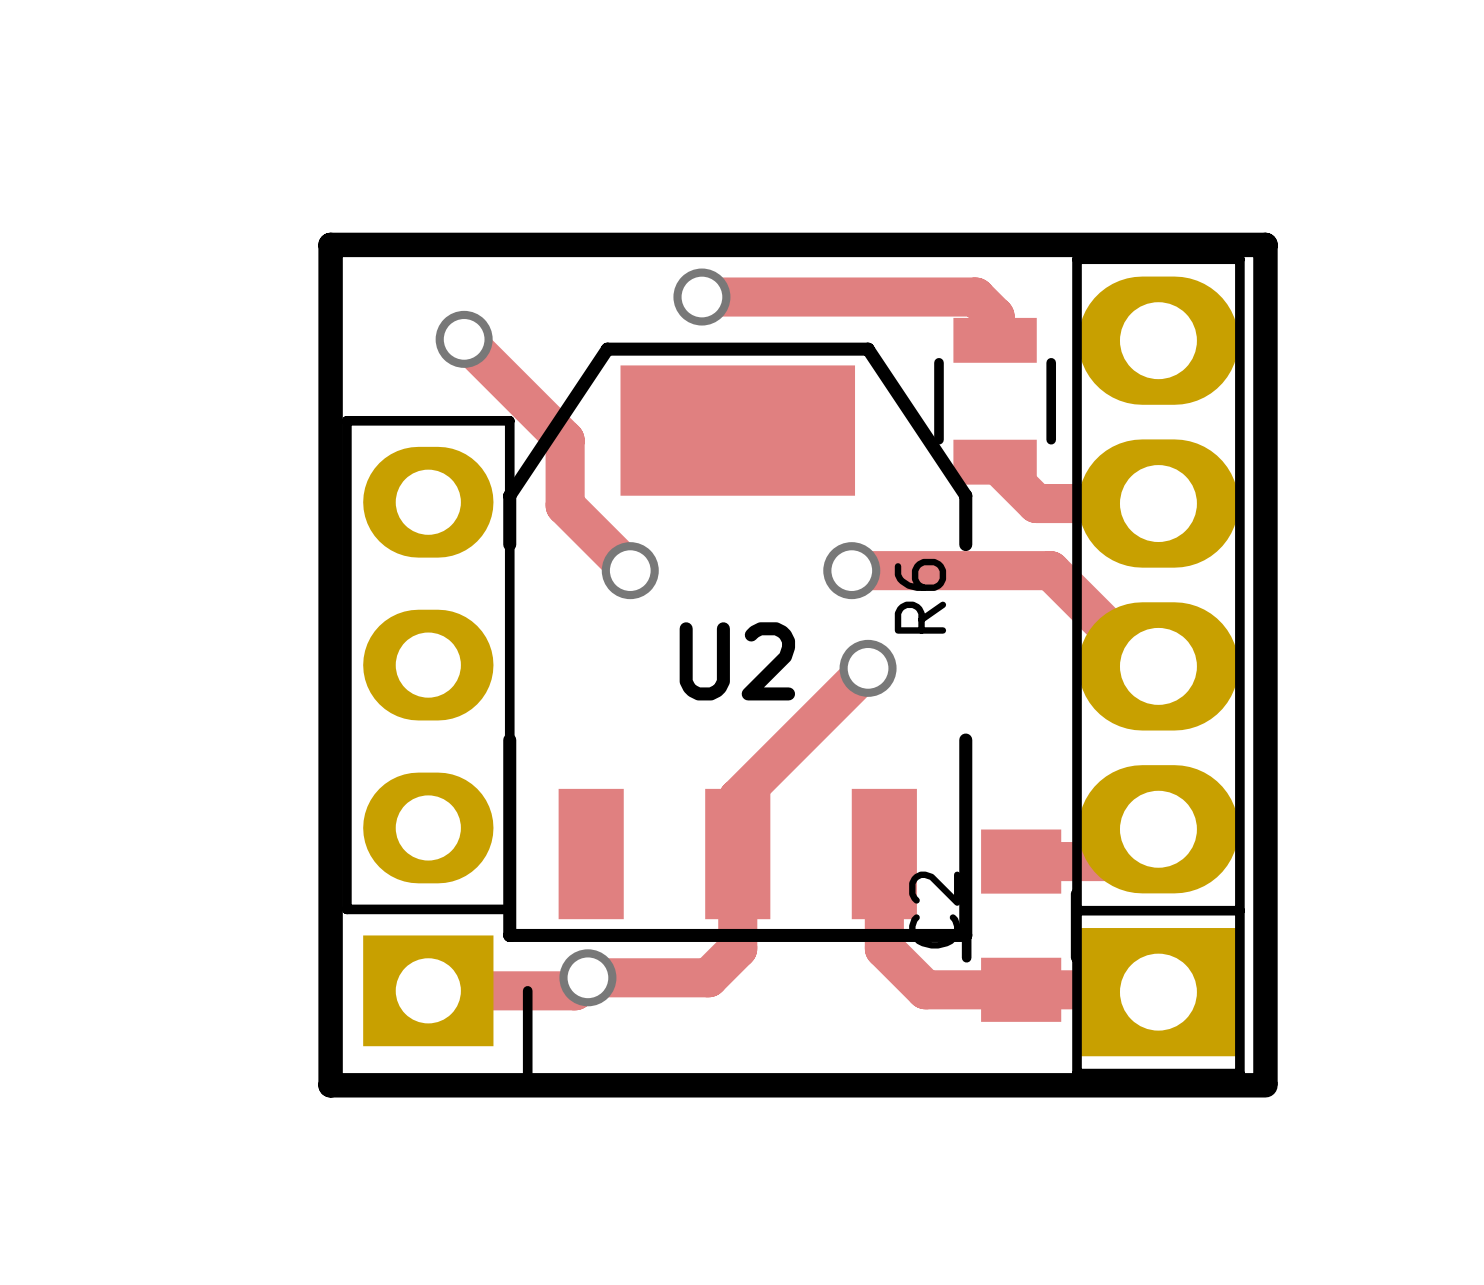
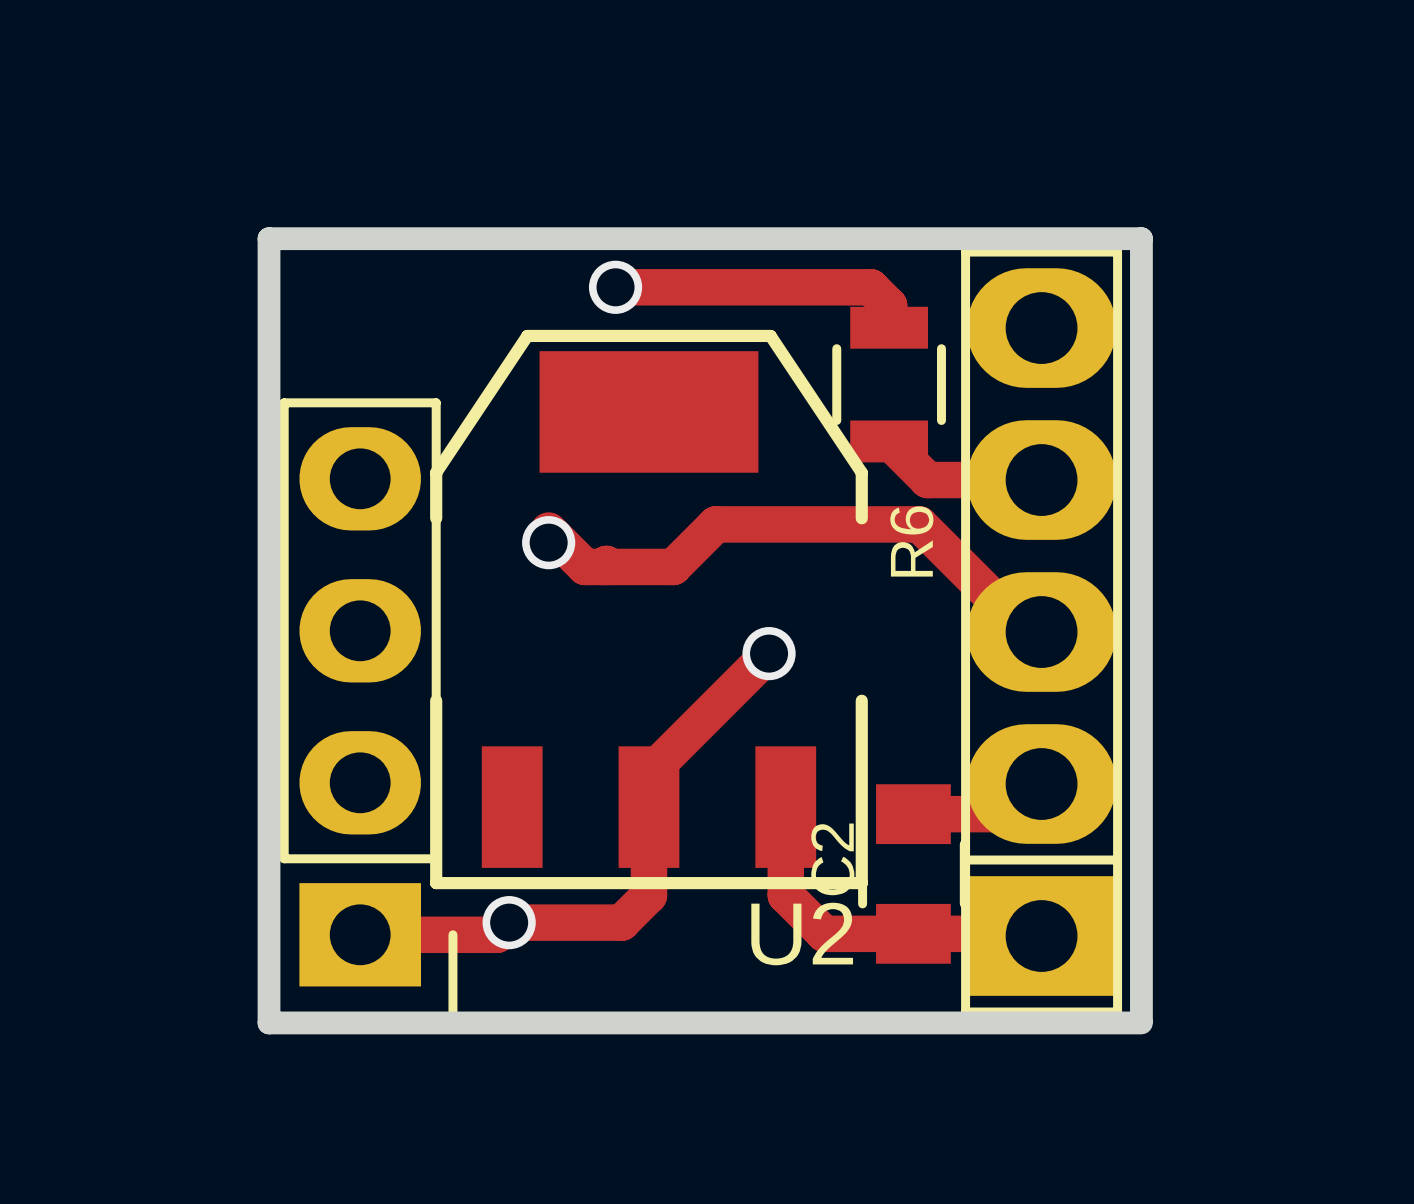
track: (464, 339) (565, 440) (565, 505) (630, 570) -> none
via: (464, 339) -> none
track: (851, 570) (1050, 570) (1146, 666) -> (548, 530) (585, 566) (603, 566) (606, 563) (606, 566) (673, 566) (715, 524) (919, 524) (1027, 632) (1030, 632)
via: (851, 570) -> none
R6 name position: R6 (920, 596) -> R6 (911, 541)
U2 name position: U2 (737, 661) -> U2 (802, 934)
track: (868, 668) (737, 798) (737, 818) -> (769, 653) (648, 773)
via position: (868, 668) -> (769, 653)

